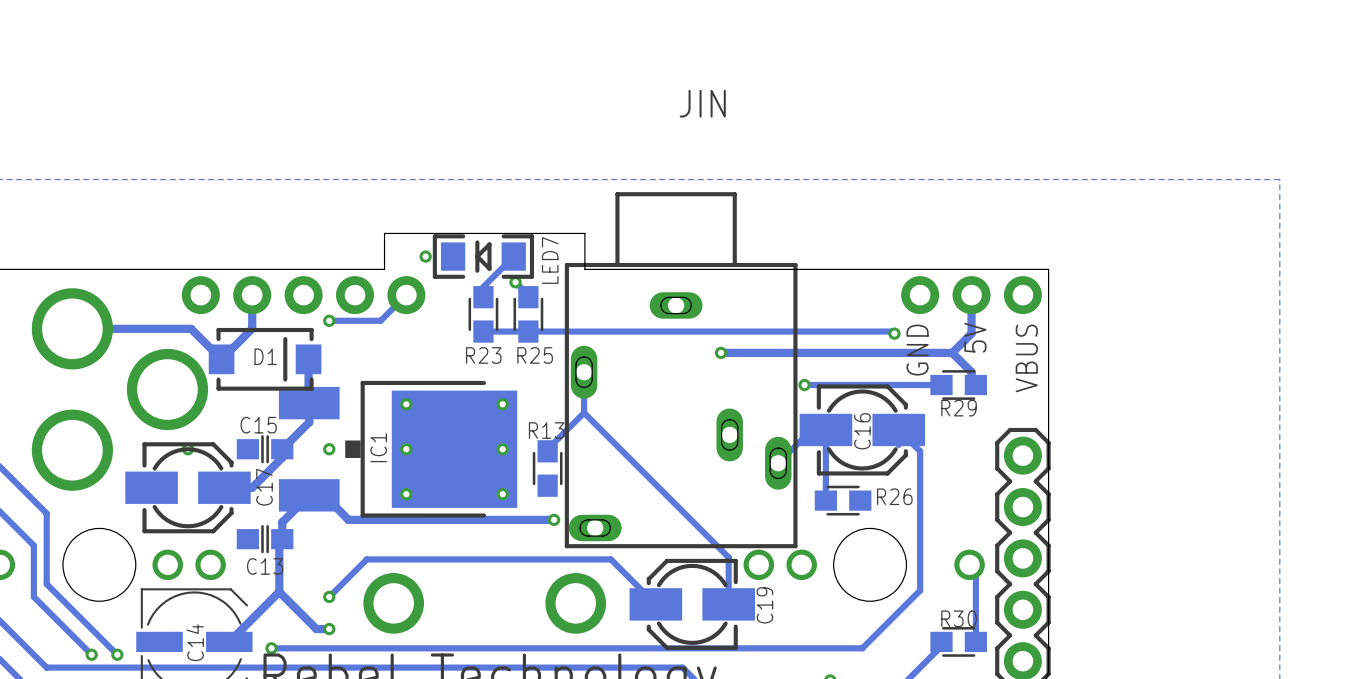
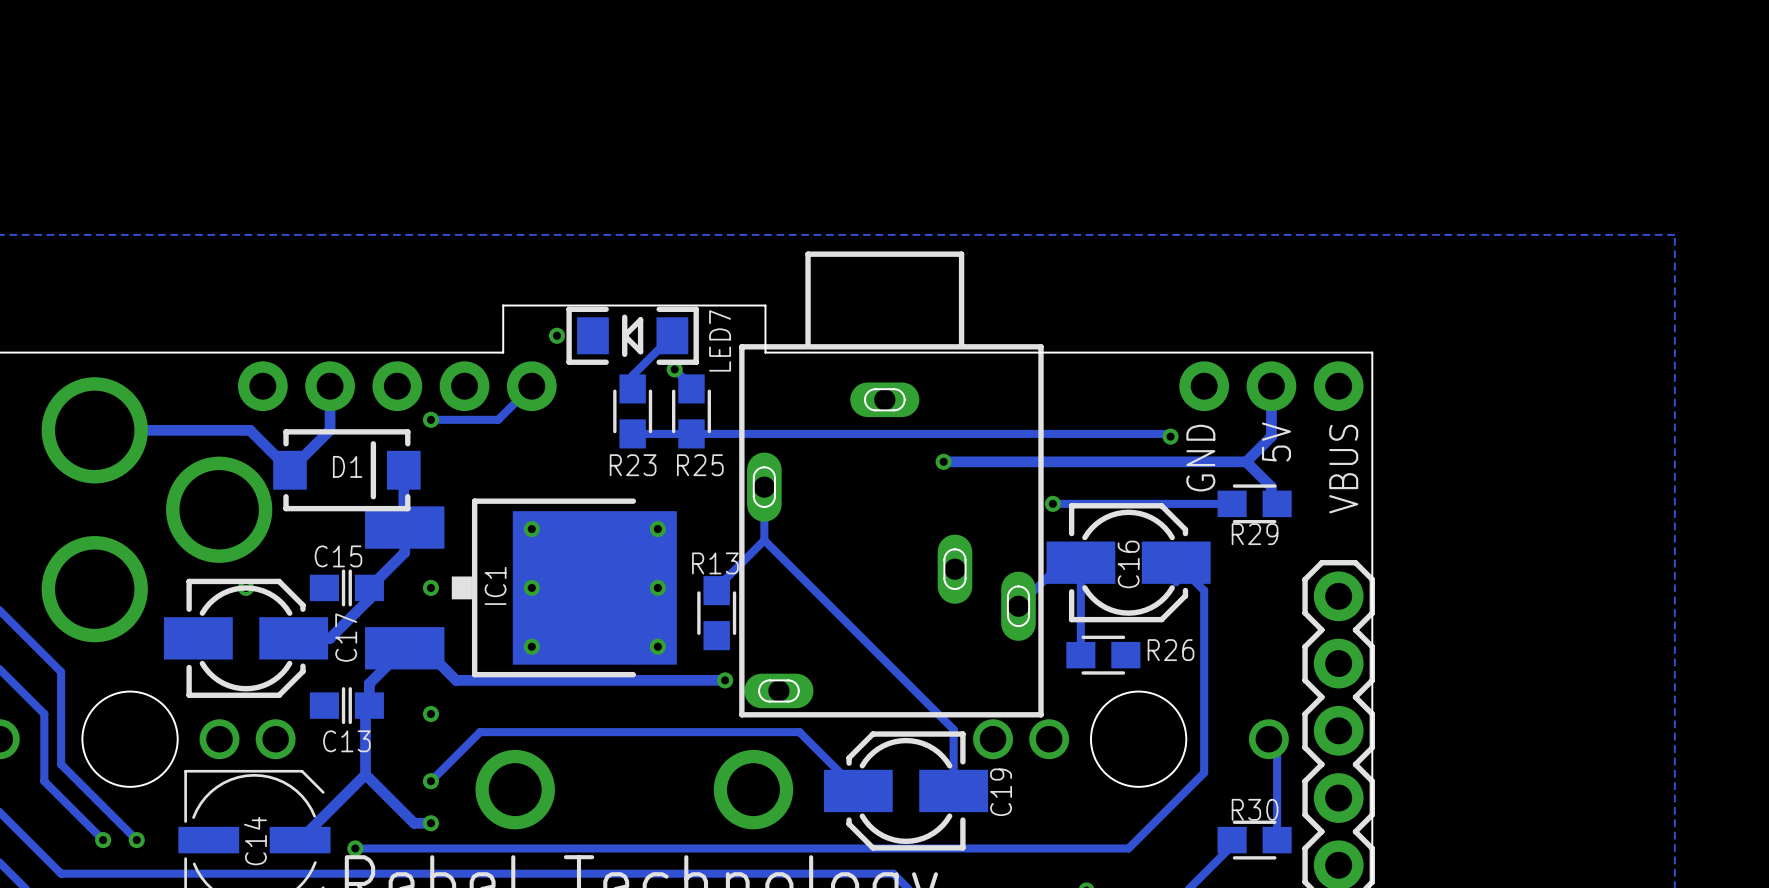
JIN name: JIN (702, 103) -> none
via: none -> (430, 713)
track: (78, 641) (91, 654) -> none
via: none -> (103, 840)
track: (104, 641) (117, 654) -> none
via: none -> (136, 840)
via: (91, 654) -> none
via: (117, 654) -> none

